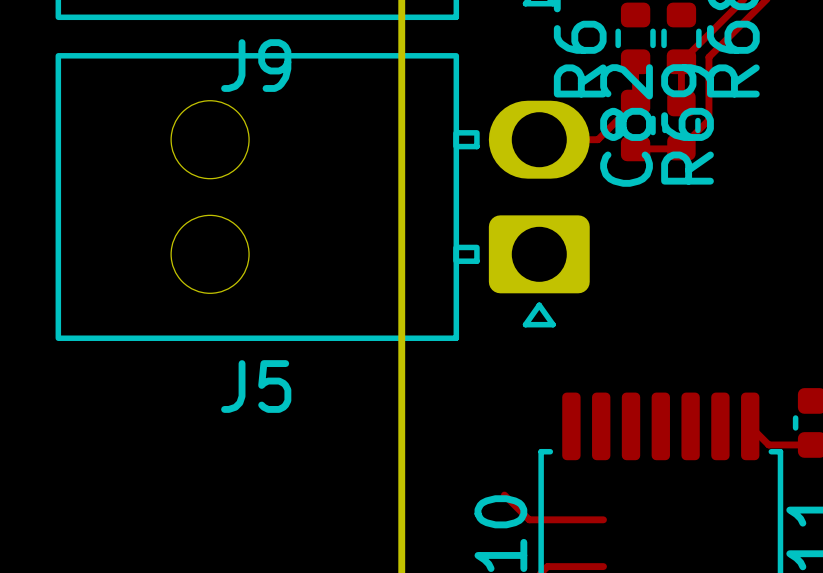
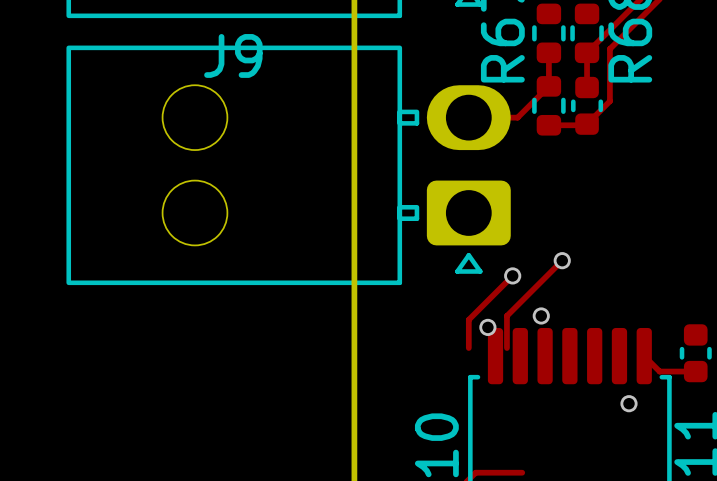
R69 name: R69 (687, 124) -> none
C82 name: C82 (626, 125) -> none
top track: none -> (562, 260) (506, 315) (506, 348)
via: none -> (562, 260)
top track: none -> (512, 275) (468, 319) (468, 348)
via: none -> (512, 275)
via: none -> (541, 315)
J5 name: J5 (256, 386) -> none
via: none -> (487, 327)
via: none -> (629, 403)
top track: (504, 495) (529, 519) (603, 519) -> none

